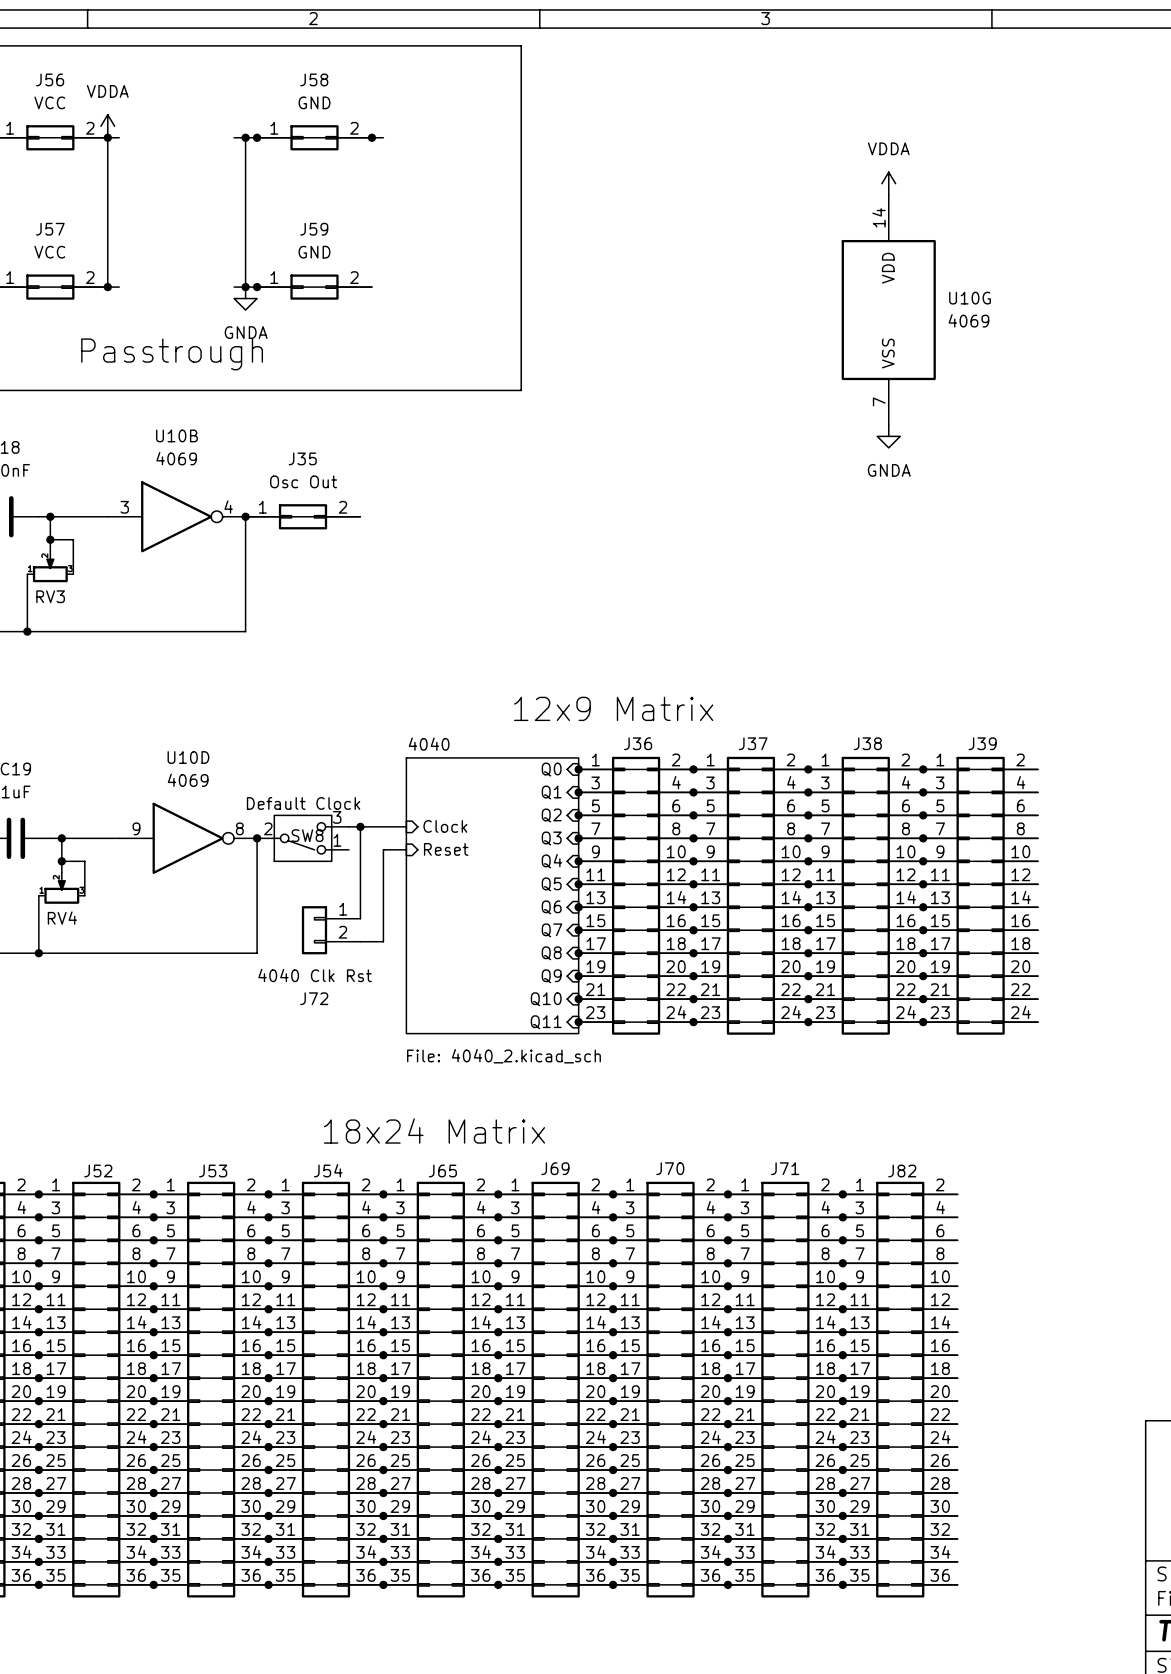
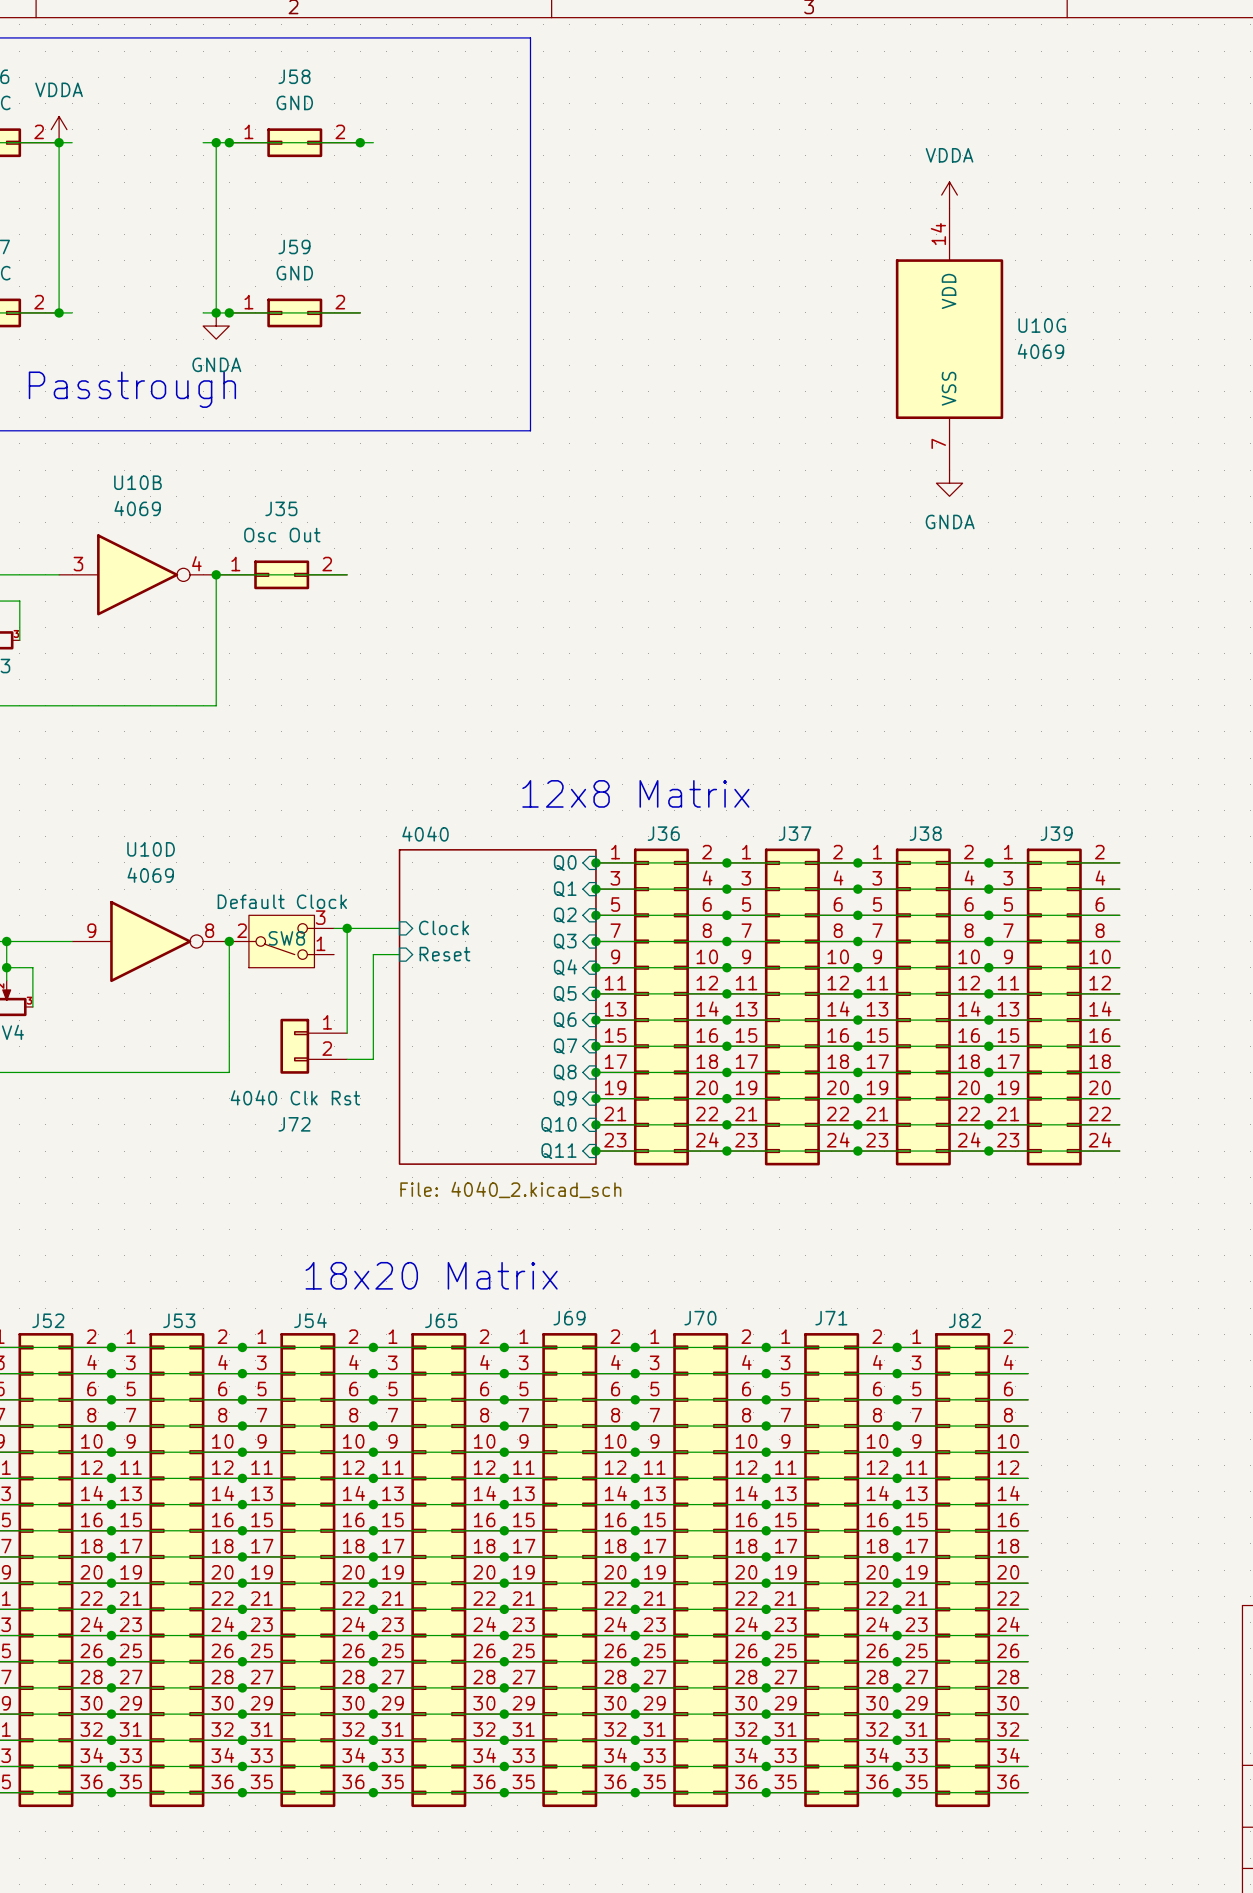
text: 12x9 Matrix (613, 708) -> 12x8 Matrix (635, 793)
text: 18x24 Matrix (434, 1131) -> 18x20 Matrix (431, 1275)

